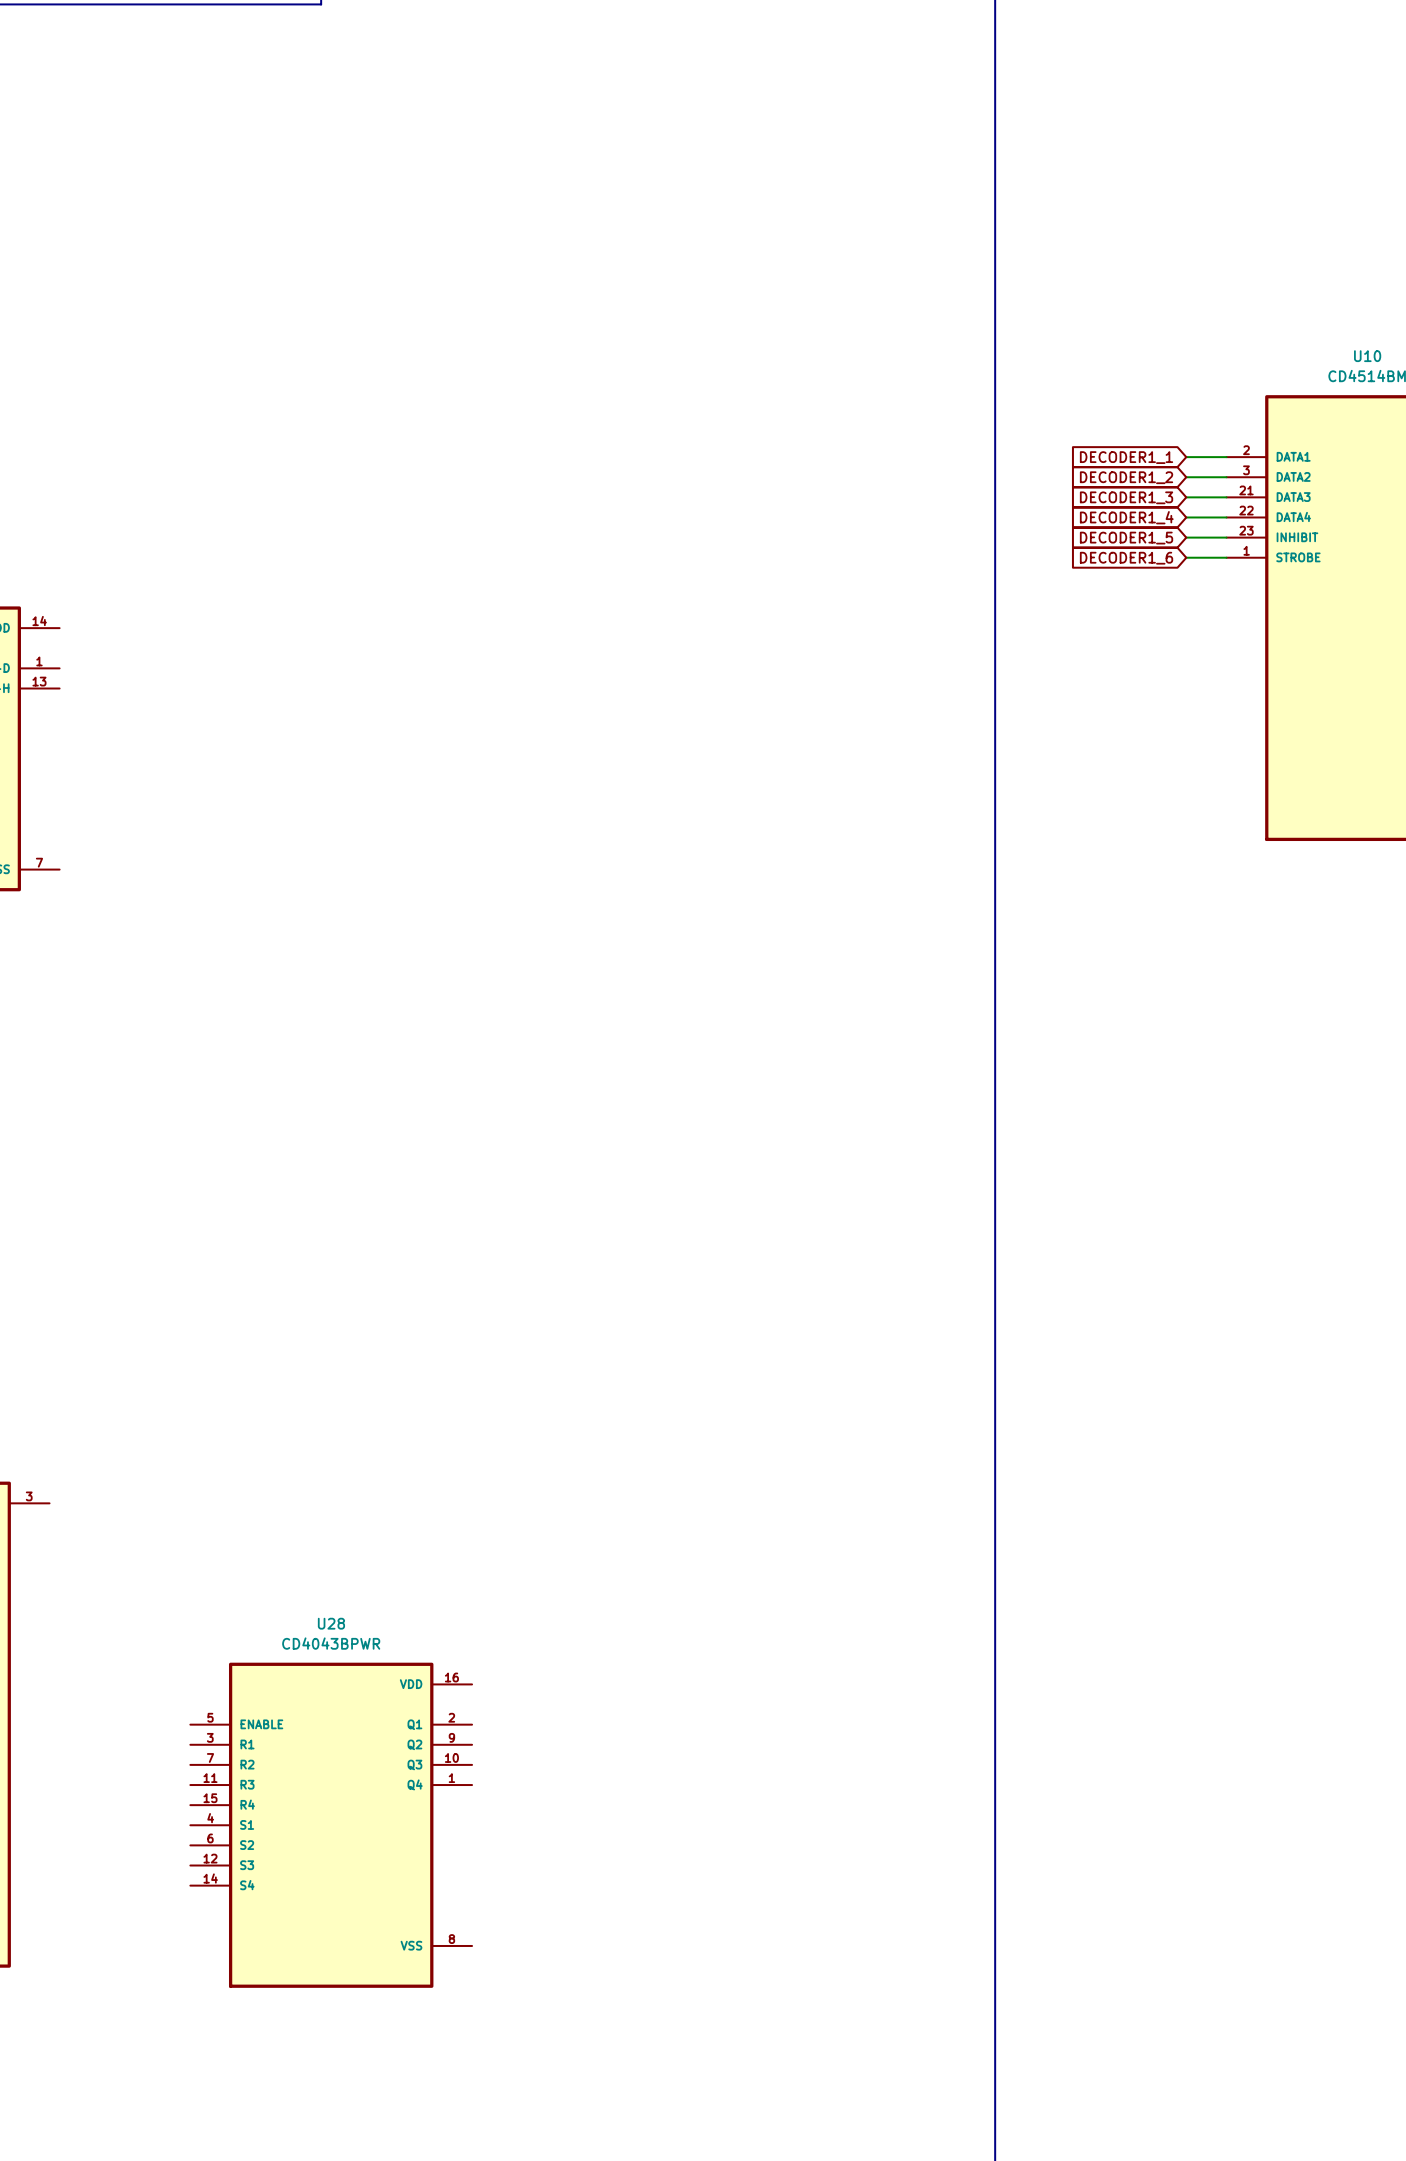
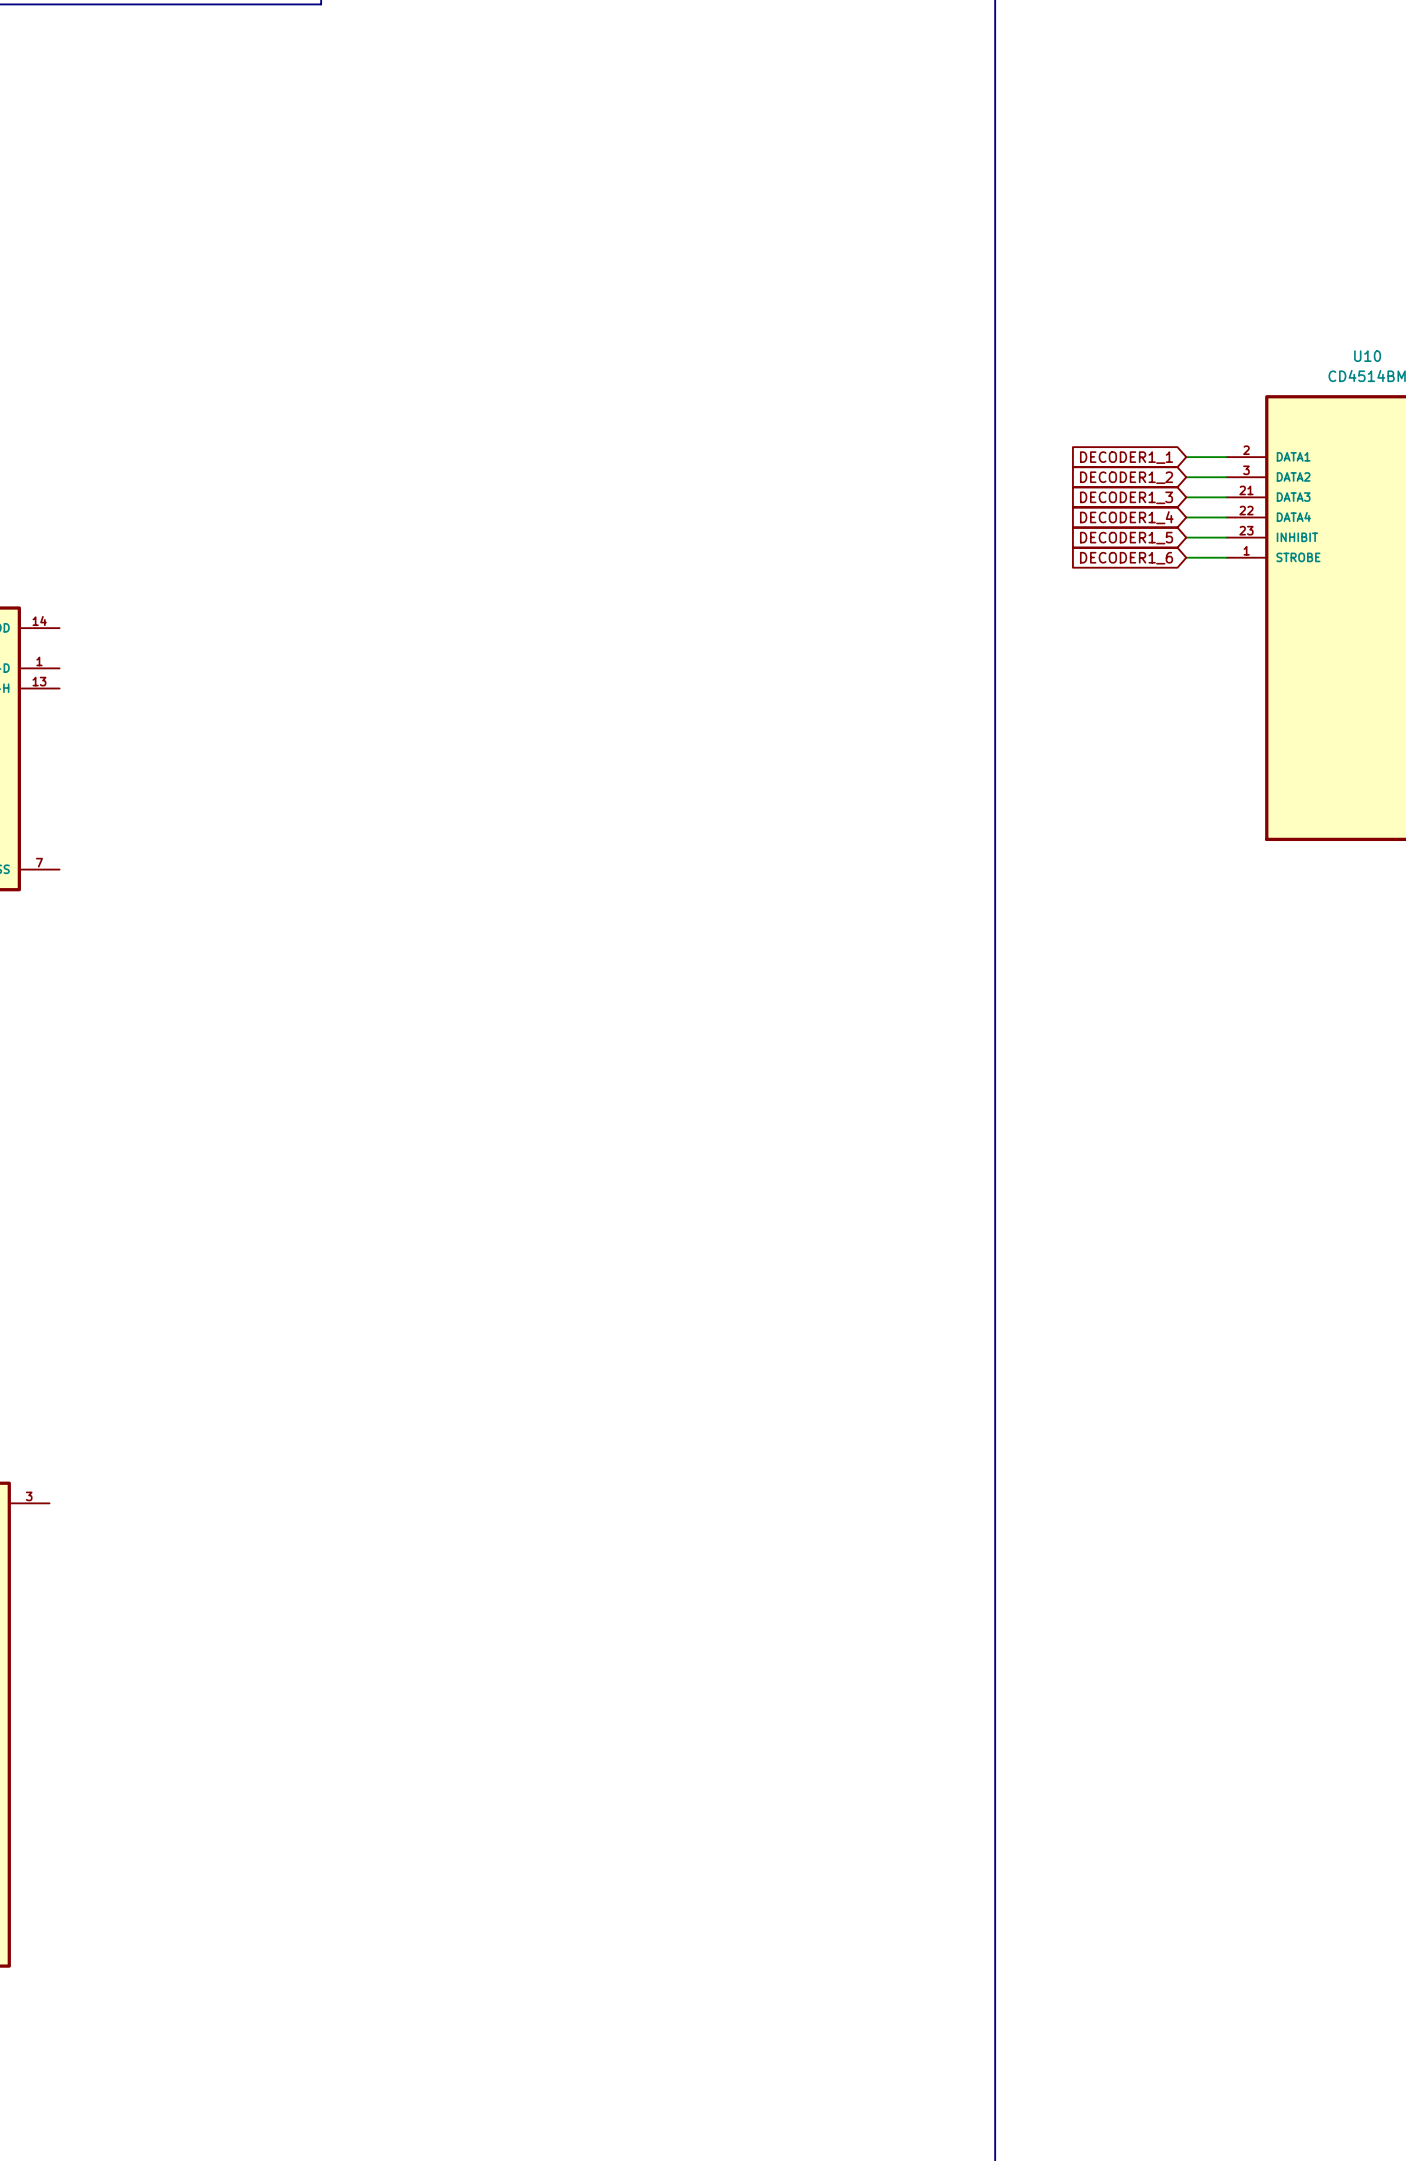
U28: CD4043BPWR (331, 1825) -> none

